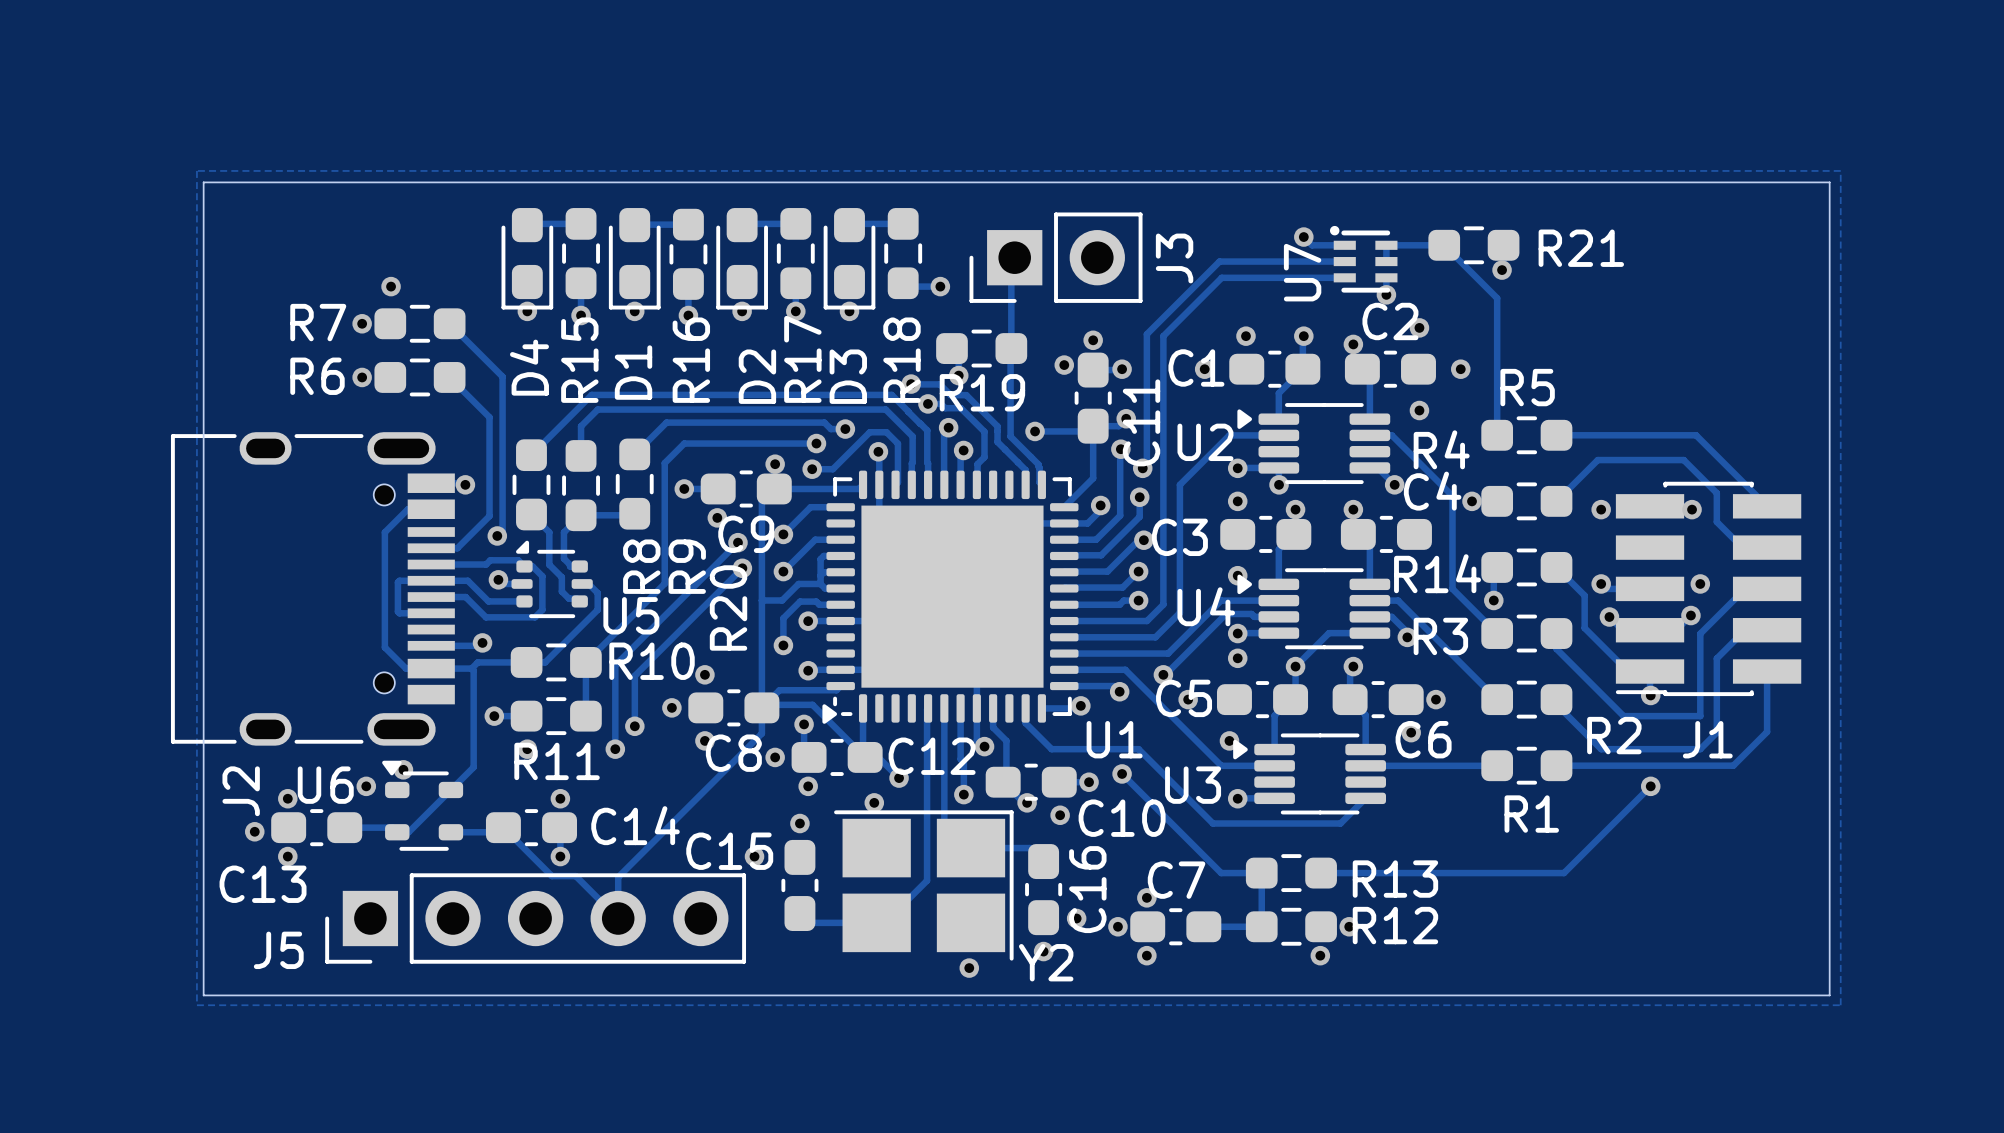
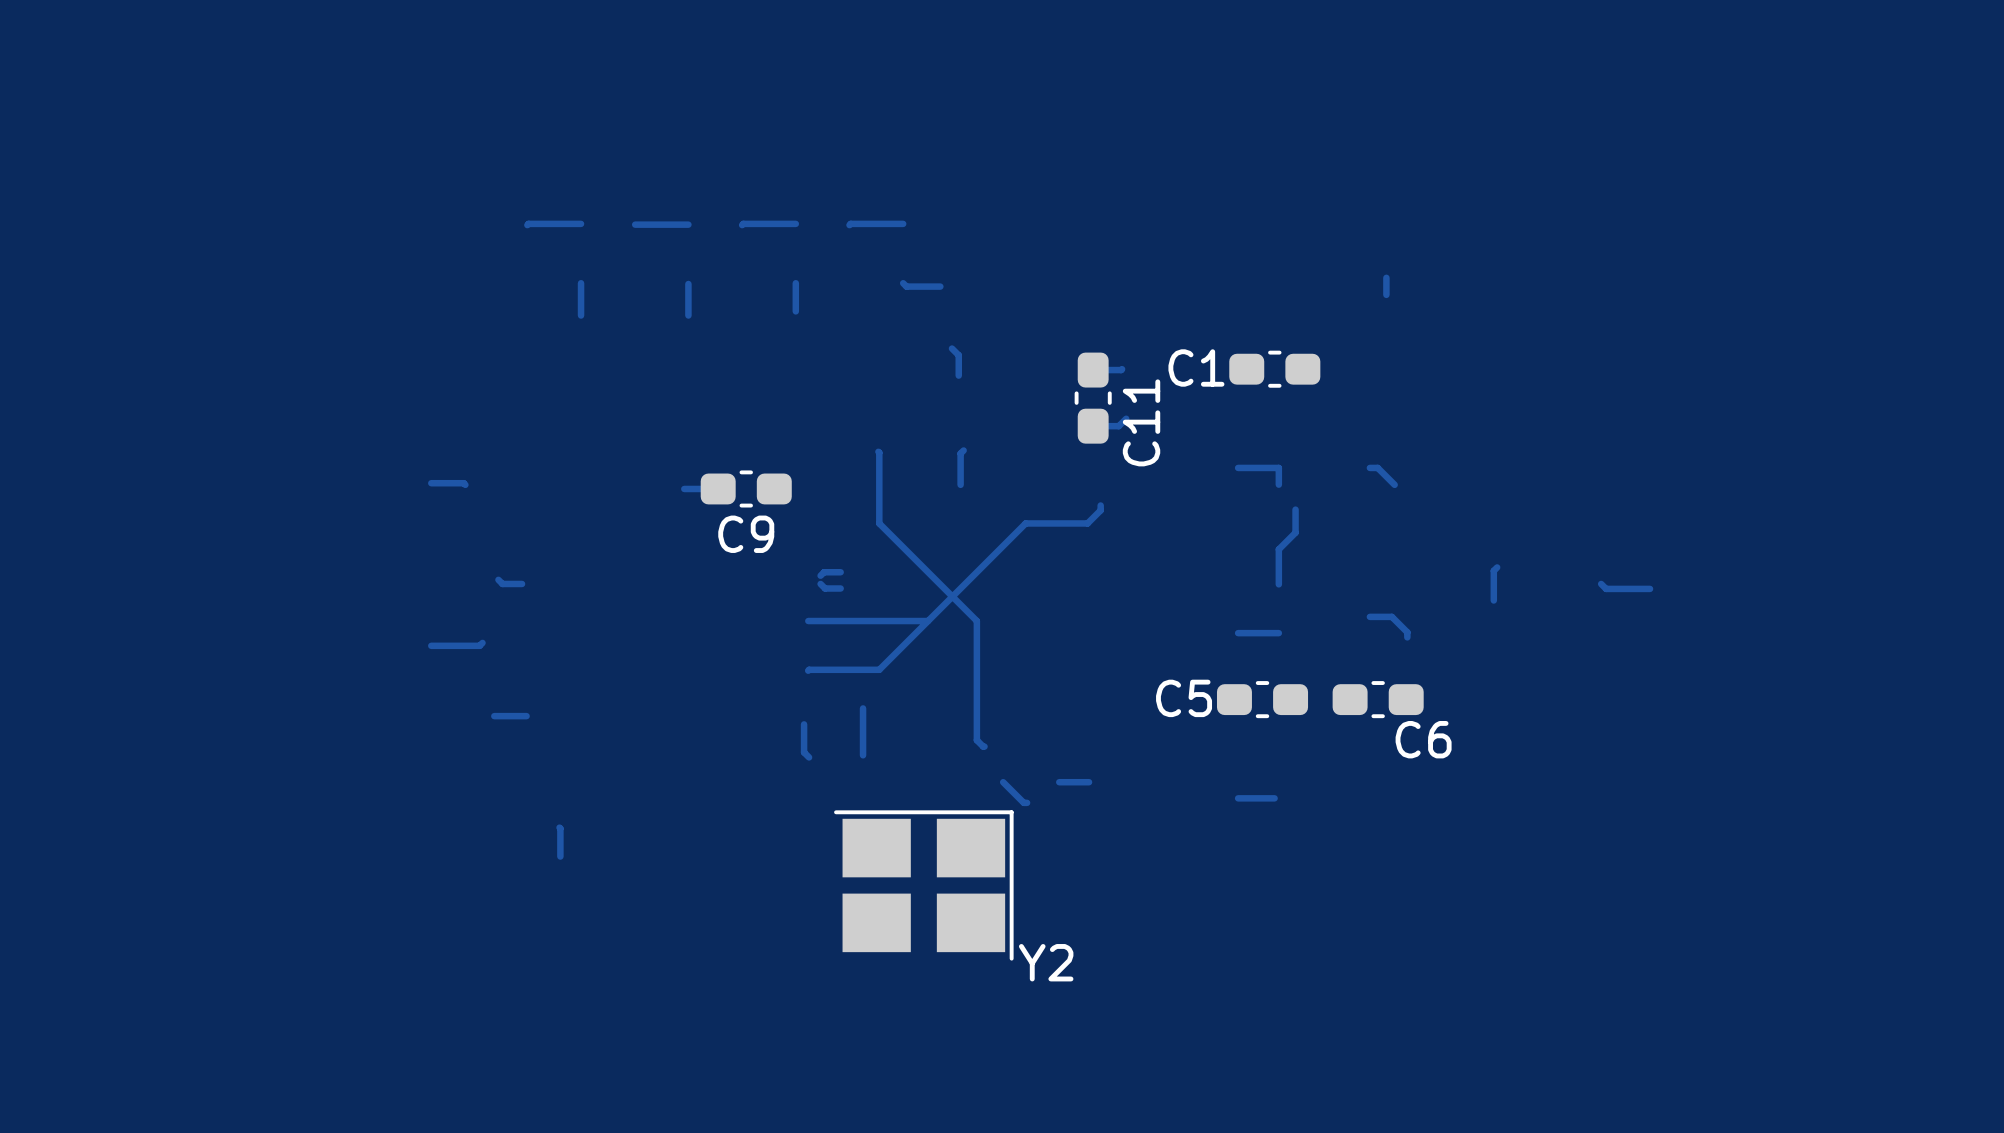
zone outline: (196, 170) (1840, 170) (1840, 1005) (196, 1005) (196, 170) -> none
board edge: (203, 182) (1829, 182) (1829, 995) (203, 995) (203, 182) -> none
track: (1303, 237) (1312, 245) (1344, 245) -> none
via: (1303, 237) -> none
R21: (1473, 245) -> none
R15: (581, 253) -> none
R17: (795, 253) -> none
R18: (903, 253) -> none
R16: (688, 254) -> none
track: (1014, 257) (1011, 261) (1010, 436) (1038, 464) (1039, 482) (1041, 484) -> none
J3: (1056, 257) -> none
D4: (527, 258) -> none
D1: (634, 258) -> none
D2: (742, 258) -> none
D3: (849, 258) -> none
U7: (1363, 259) -> none
track: (1344, 261) (1219, 261) (1146, 334) (1146, 464) (1142, 468) -> none
track: (1386, 261) (1386, 245) (1444, 245) (1497, 298) (1497, 435) -> none
via: (1502, 270) -> none
track: (1344, 277) (1221, 277) (1163, 336) (1163, 604) (1146, 621) (1064, 621) -> none
via: (391, 286) -> none
via: (940, 286) -> none
via: (1386, 294) -> none
via: (527, 311) -> none
via: (634, 311) -> none
via: (742, 311) -> none
via: (795, 311) -> none
via: (849, 311) -> none
via: (581, 315) -> none
via: (688, 315) -> none
via: (362, 323) -> none
R7: (419, 323) -> none
track: (449, 323) (502, 376) (502, 530) (497, 535) -> none
via: (1419, 327) -> none
via: (1245, 336) -> none
track: (1303, 336) (1302, 369) (1278, 393) (1278, 419) -> none
via: (1303, 336) -> none
via: (1093, 340) -> none
via: (1353, 344) -> none
R19: (981, 348) -> none
via: (1064, 365) -> none
via: (1122, 369) -> none
via: (1204, 369) -> none
track: (1362, 369) (1369, 376) (1369, 419) -> none
C2: (1390, 369) -> none
via: (1460, 369) -> none
via: (958, 375) -> none
via: (362, 377) -> none
R6: (419, 377) -> none
track: (449, 377) (489, 417) (489, 516) (457, 548) (431, 548) -> none
track: (911, 384) (939, 384) (950, 395) (966, 395) (997, 426) (997, 441) (1025, 470) (1025, 484) -> none
via: (911, 384) -> none
track: (927, 403) (940, 403) (945, 408) (960, 408) (984, 431) (984, 457) (977, 464) (976, 484) -> none
via: (927, 403) -> none
via: (1419, 410) -> none
track: (908, 411) (891, 394) (591, 394) (531, 455) -> none
track: (908, 412) (919, 423) -> none
via: (1126, 418) -> none
track: (920, 423) (927, 430) (928, 484) -> none
track: (948, 427) (944, 432) (944, 484) -> none
via: (948, 427) -> none
track: (845, 429) (830, 429) (824, 422) (666, 422) (634, 454) -> none
via: (845, 429) -> none
track: (1035, 431) (1087, 431) (1093, 426) (1093, 478) (1064, 507) -> none
via: (1035, 431) -> none
track: (1278, 435) (1229, 435) (1179, 484) (1179, 612) (1155, 637) (1064, 637) -> none
track: (1369, 435) (1391, 435) (1452, 496) (1452, 588) (1497, 633) -> none
R5: (1526, 435) -> none
track: (1556, 435) (1696, 435) (1767, 506) -> none
track: (816, 443) (684, 443) (664, 463) (664, 583) (585, 662) (585, 716) -> none
via: (816, 443) -> none
U2: (1313, 443) -> none
track: (1120, 449) (1120, 515) (1096, 539) (1064, 539) -> none
via: (1120, 449) -> none
via: (963, 450) -> none
via: (878, 451) -> none
track: (581, 455) (581, 426) (597, 409) (885, 409) (912, 436) (911, 484) -> none
via: (775, 464) -> none
via: (1142, 468) -> none
via: (1237, 468) -> none
track: (812, 469) (832, 469) (869, 432) (886, 432) (897, 443) (897, 482) (895, 484) -> none
via: (812, 469) -> none
via: (465, 484) -> none
R8: (531, 484) -> none
R20: (634, 484) -> none
track: (863, 484) (858, 488) (774, 488) -> none
via: (1279, 484) -> none
via: (1394, 484) -> none
R9: (581, 485) -> none
via: (684, 488) -> none
track: (774, 488) (761, 501) (761, 733) (618, 877) (618, 918) (575, 876) (551, 876) (503, 827) (498, 832) (450, 832) -> none
track: (1139, 497) (1139, 516) (1101, 555) (1064, 555) -> none
via: (1139, 497) -> none
via: (1237, 501) -> none
via: (1472, 501) -> none
R4: (1526, 501) -> none
track: (1556, 501) (1597, 460) (1683, 460) (1716, 493) (1716, 521) (1742, 547) (1767, 547) -> none
via: (1100, 505) -> none
track: (840, 507) (810, 507) (783, 534) -> none
track: (431, 509) (407, 509) (384, 532) (384, 647) (406, 668) (471, 668) -> none
via: (1295, 509) -> none
via: (1353, 509) -> none
via: (1601, 509) -> none
via: (1692, 509) -> none
track: (634, 513) (581, 515) (563, 532) (563, 558) (570, 566) (579, 566) -> none
track: (531, 514) (549, 532) (549, 564) (561, 577) (561, 591) (568, 598) (576, 598) (579, 601) -> none
via: (717, 517) -> none
via: (783, 534) -> none
C3: (1265, 534) -> none
track: (1358, 534) (1369, 545) (1369, 584) -> none
C4: (1386, 534) -> none
via: (497, 535) -> none
track: (840, 539) (815, 539) (783, 571) -> none
track: (1143, 540) (1138, 540) (1107, 571) (1064, 572) -> none
via: (1143, 540) -> none
track: (737, 542) (615, 665) (615, 749) -> none
via: (737, 542) -> none
track: (840, 555) (823, 555) (820, 559) (820, 583) (798, 583) (782, 600) (761, 600) -> none
track: (431, 564) (486, 564) (490, 560) (518, 560) (524, 566) (532, 566) (542, 576) (542, 609) (534, 617) (485, 617) (465, 597) (431, 597) -> none
R14: (1526, 567) -> none
track: (1556, 567) (1584, 595) (1584, 628) (1628, 671) (1650, 671) (1650, 695) -> none
track: (742, 568) (634, 675) (634, 726) -> none
via: (742, 568) -> none
via: (783, 571) -> none
track: (1138, 571) (1122, 587) (1064, 588) -> none
via: (1138, 571) -> none
via: (1237, 575) -> none
via: (498, 579) -> none
U5: (552, 579) -> none
track: (582, 583) (588, 583) (597, 593) (597, 609) (545, 662) (477, 662) (471, 668) -> none
via: (1601, 583) -> none
via: (1700, 583) -> none
J2: (312, 588) -> none
J1: (1708, 588) -> none
track: (1767, 588) (1745, 588) (1700, 633) (1700, 716) (1623, 716) (1556, 648) (1556, 633) -> none
U1: (950, 597) -> none
track: (1138, 600) (1123, 600) (1119, 604) (1064, 604) -> none
via: (1138, 600) -> none
track: (1278, 600) (1221, 600) (1168, 653) (1064, 653) -> none
track: (1369, 600) (1398, 600) (1497, 699) -> none
via: (1493, 600) -> none
track: (524, 601) (488, 601) (467, 580) (399, 580) (397, 582) (397, 611) (399, 613) (431, 613) -> none
track: (840, 604) (819, 604) (816, 601) (800, 601) (783, 618) (783, 645) -> none
U4: (1313, 608) -> none
via: (1690, 615) -> none
track: (1278, 616) (1226, 613) (1163, 674) -> none
via: (1609, 617) -> none
via: (808, 621) -> none
track: (1767, 630) (1745, 630) (1716, 658) (1716, 732) (1700, 749) (1601, 749) (1556, 704) (1556, 699) -> none
via: (1237, 633) -> none
track: (1369, 633) (1328, 633) (1295, 666) (1295, 694) (1274, 715) (1274, 749) -> none
R3: (1526, 633) -> none
via: (1407, 637) -> none
via: (482, 642) -> none
via: (783, 645) -> none
via: (1237, 658) -> none
R10: (556, 662) -> none
via: (1295, 666) -> none
track: (1353, 666) (1350, 669) (1350, 699) (1365, 715) (1365, 749) -> none
via: (1353, 666) -> none
track: (471, 668) (473, 670) (473, 767) (408, 832) (397, 832) (392, 827) (344, 827) -> none
track: (1064, 669) (1125, 669) (1221, 765) (1274, 765) -> none
via: (808, 670) -> none
track: (1767, 671) (1767, 731) (1733, 765) (1556, 765) -> none
via: (704, 674) -> none
via: (1163, 674) -> none
track: (840, 686) (836, 690) (779, 690) (761, 707) -> none
track: (1064, 686) (1113, 686) (1119, 691) -> none
via: (1119, 691) -> none
via: (1650, 695) -> none
via: (1188, 699) -> none
via: (1435, 699) -> none
R2: (1526, 699) -> none
track: (764, 704) (812, 704) (865, 757) (878, 757) (899, 778) -> none
track: (1080, 705) (1078, 708) (1041, 708) -> none
via: (1080, 705) -> none
via: (671, 707) -> none
C8: (733, 707) -> none
track: (928, 708) (927, 880) (884, 922) (809, 922) (799, 913) -> none
track: (944, 708) (944, 821) (970, 848) (1030, 848) (1043, 861) -> none
track: (960, 708) (960, 759) (963, 762) (963, 794) -> none
track: (993, 708) (993, 727) (1006, 740) (1006, 769) (994, 782) -> none
track: (1025, 708) (1025, 723) (1051, 749) (1138, 749) (1212, 823) (1340, 823) (1365, 798) -> none
via: (494, 716) -> none
R11: (556, 716) -> none
via: (804, 724) -> none
via: (634, 726) -> none
via: (1411, 732) -> none
via: (704, 740) -> none
via: (1229, 740) -> none
via: (984, 746) -> none
via: (527, 749) -> none
via: (615, 749) -> none
via: (775, 757) -> none
C12: (837, 757) -> none
track: (1365, 765) (1497, 765) -> none
R1: (1526, 765) -> none
via: (403, 769) -> none
track: (1122, 773) (1221, 873) (1261, 873) (1261, 926) (1203, 926) -> none
via: (1122, 773) -> none
U3: (1309, 773) -> none
via: (899, 778) -> none
C10: (1031, 782) -> none
via: (1089, 782) -> none
via: (366, 786) -> none
via: (808, 786) -> none
track: (1650, 786) (1564, 873) (1321, 873) -> none
via: (1650, 786) -> none
via: (963, 794) -> none
via: (287, 798) -> none
via: (560, 798) -> none
via: (1237, 798) -> none
via: (874, 802) -> none
via: (1027, 802) -> none
U6: (422, 805) -> none
via: (1060, 815) -> none
via: (799, 823) -> none
C13: (316, 827) -> none
C14: (531, 827) -> none
via: (254, 831) -> none
via: (287, 856) -> none
via: (560, 856) -> none
via: (754, 856) -> none
R12: (1291, 873) -> none
C15: (799, 885) -> none
C16: (1043, 889) -> none
via: (1146, 897) -> none
J5: (535, 918) -> none
via: (1076, 918) -> none
via: (1117, 926) -> none
C7: (1175, 926) -> none
R13: (1291, 926) -> none
via: (1349, 926) -> none
via: (1043, 951) -> none
via: (1146, 955) -> none
via: (1320, 955) -> none
via: (969, 968) -> none

